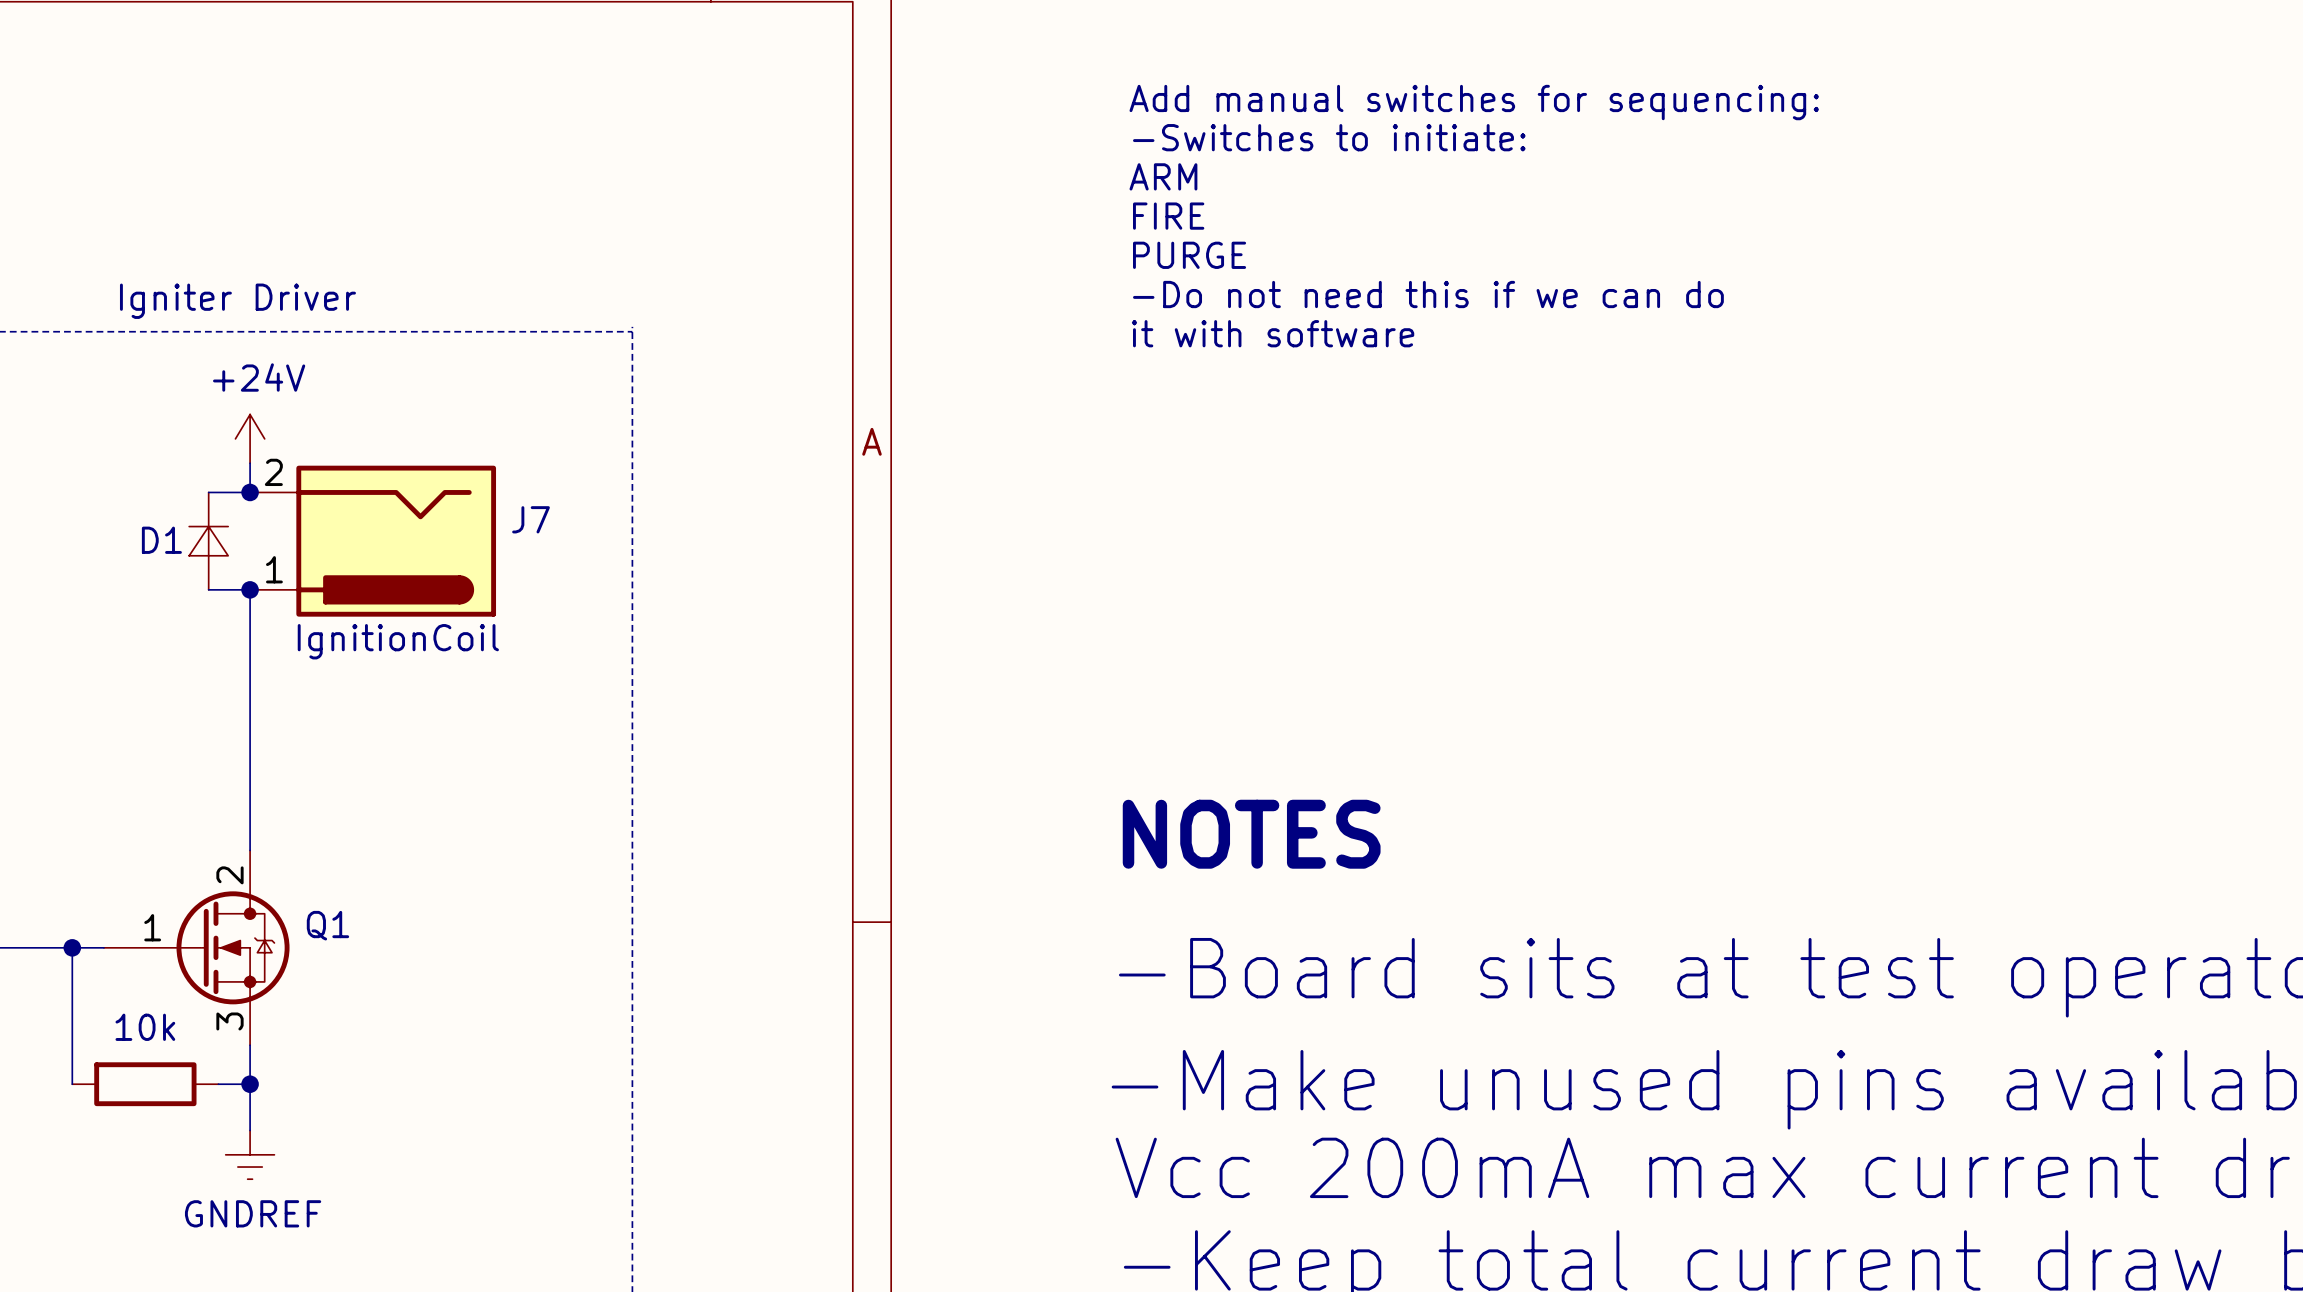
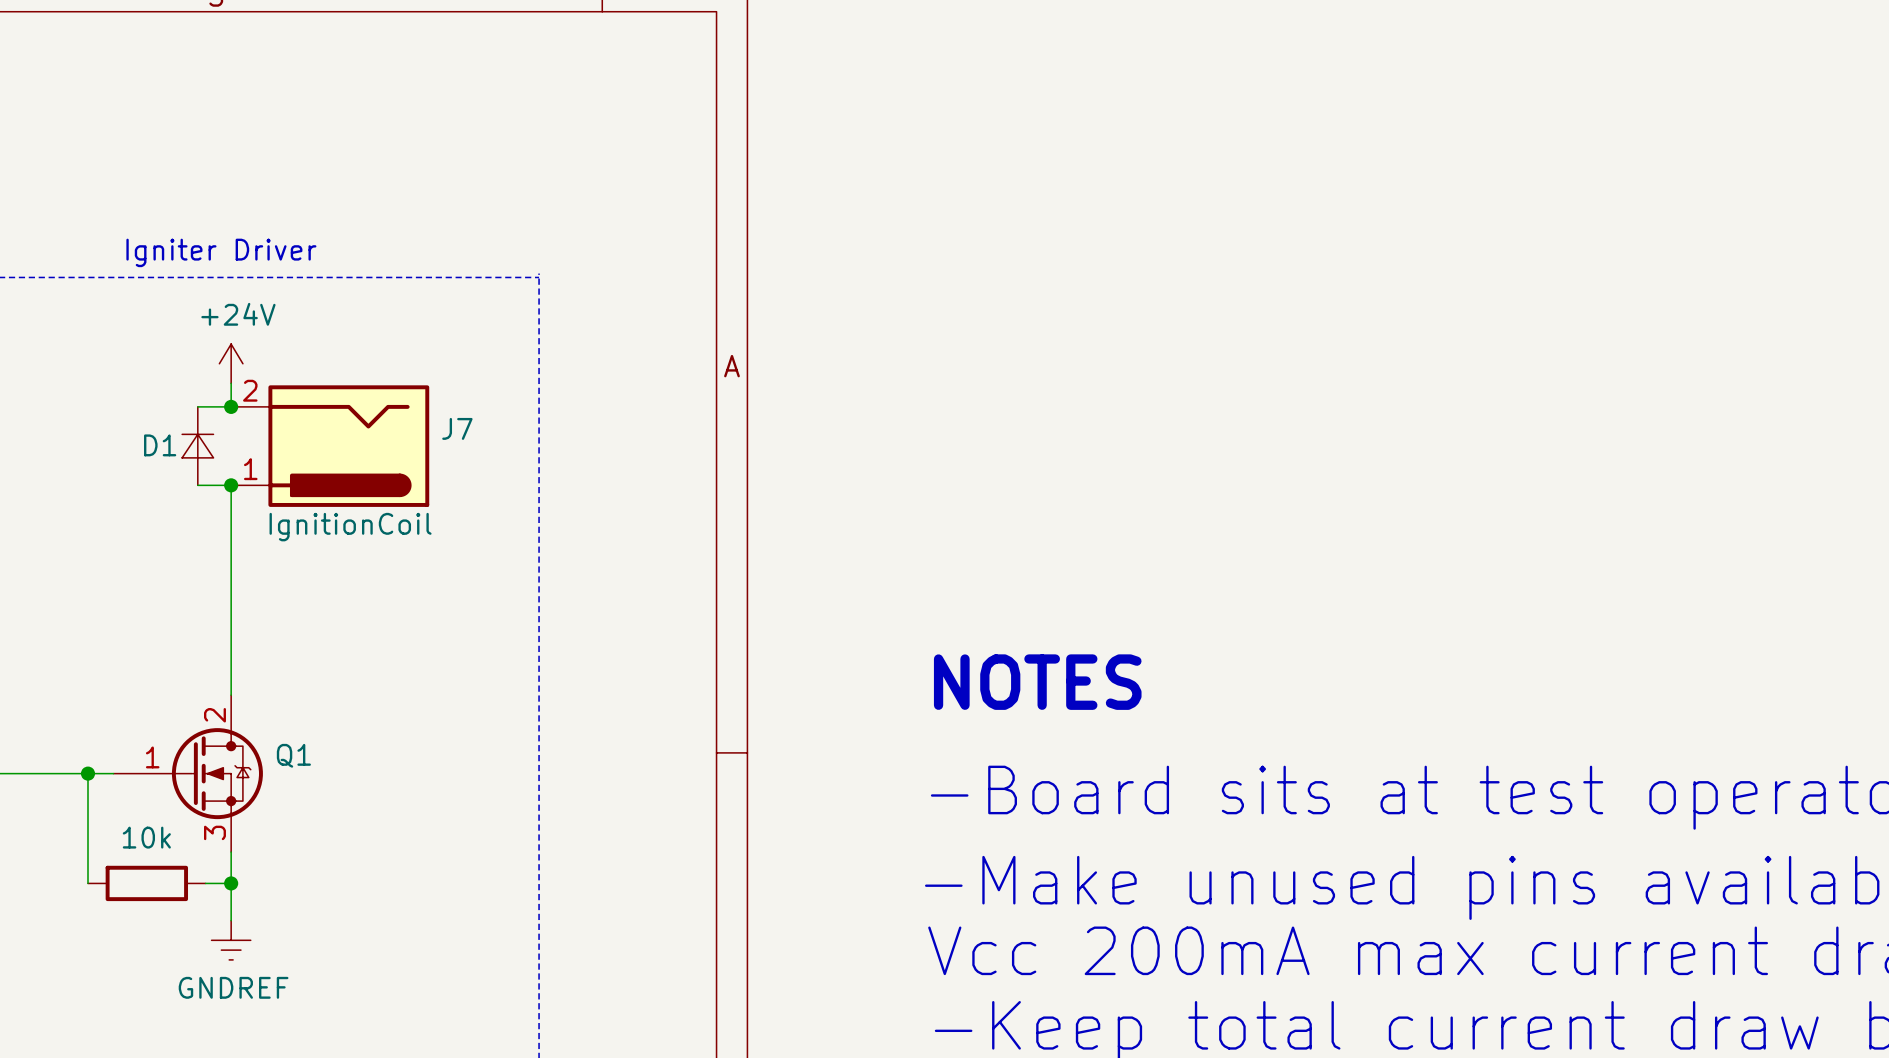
text: Add manual switches for sequencing: (1474, 102) -> none
text: -Switches to initiate: (1329, 137) -> none
text: ARM (1163, 176) -> none
text: FIRE (1168, 216) -> none
text: PURGE (1189, 255) -> none
text: -Do not need this if we can do (1428, 294) -> none
text: it with software (1273, 333) -> none

